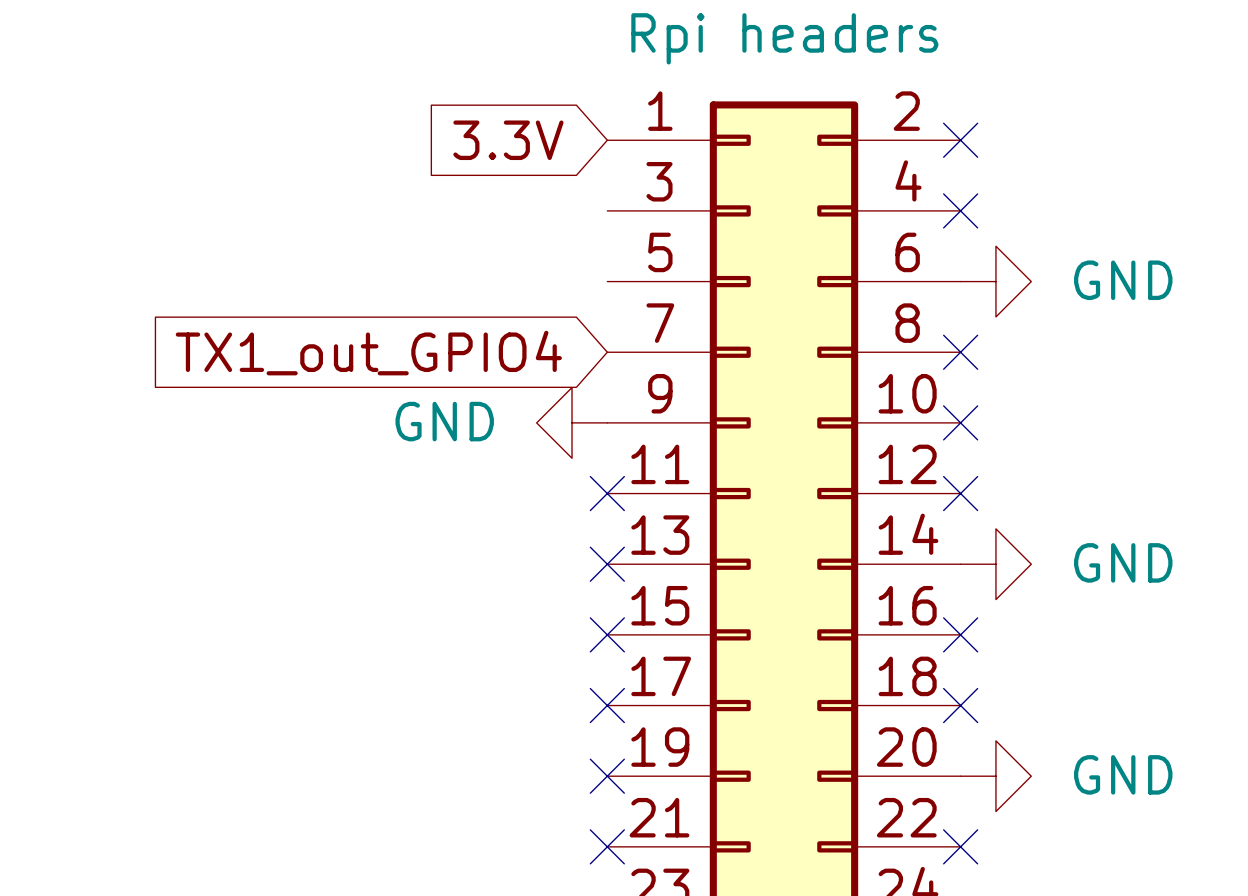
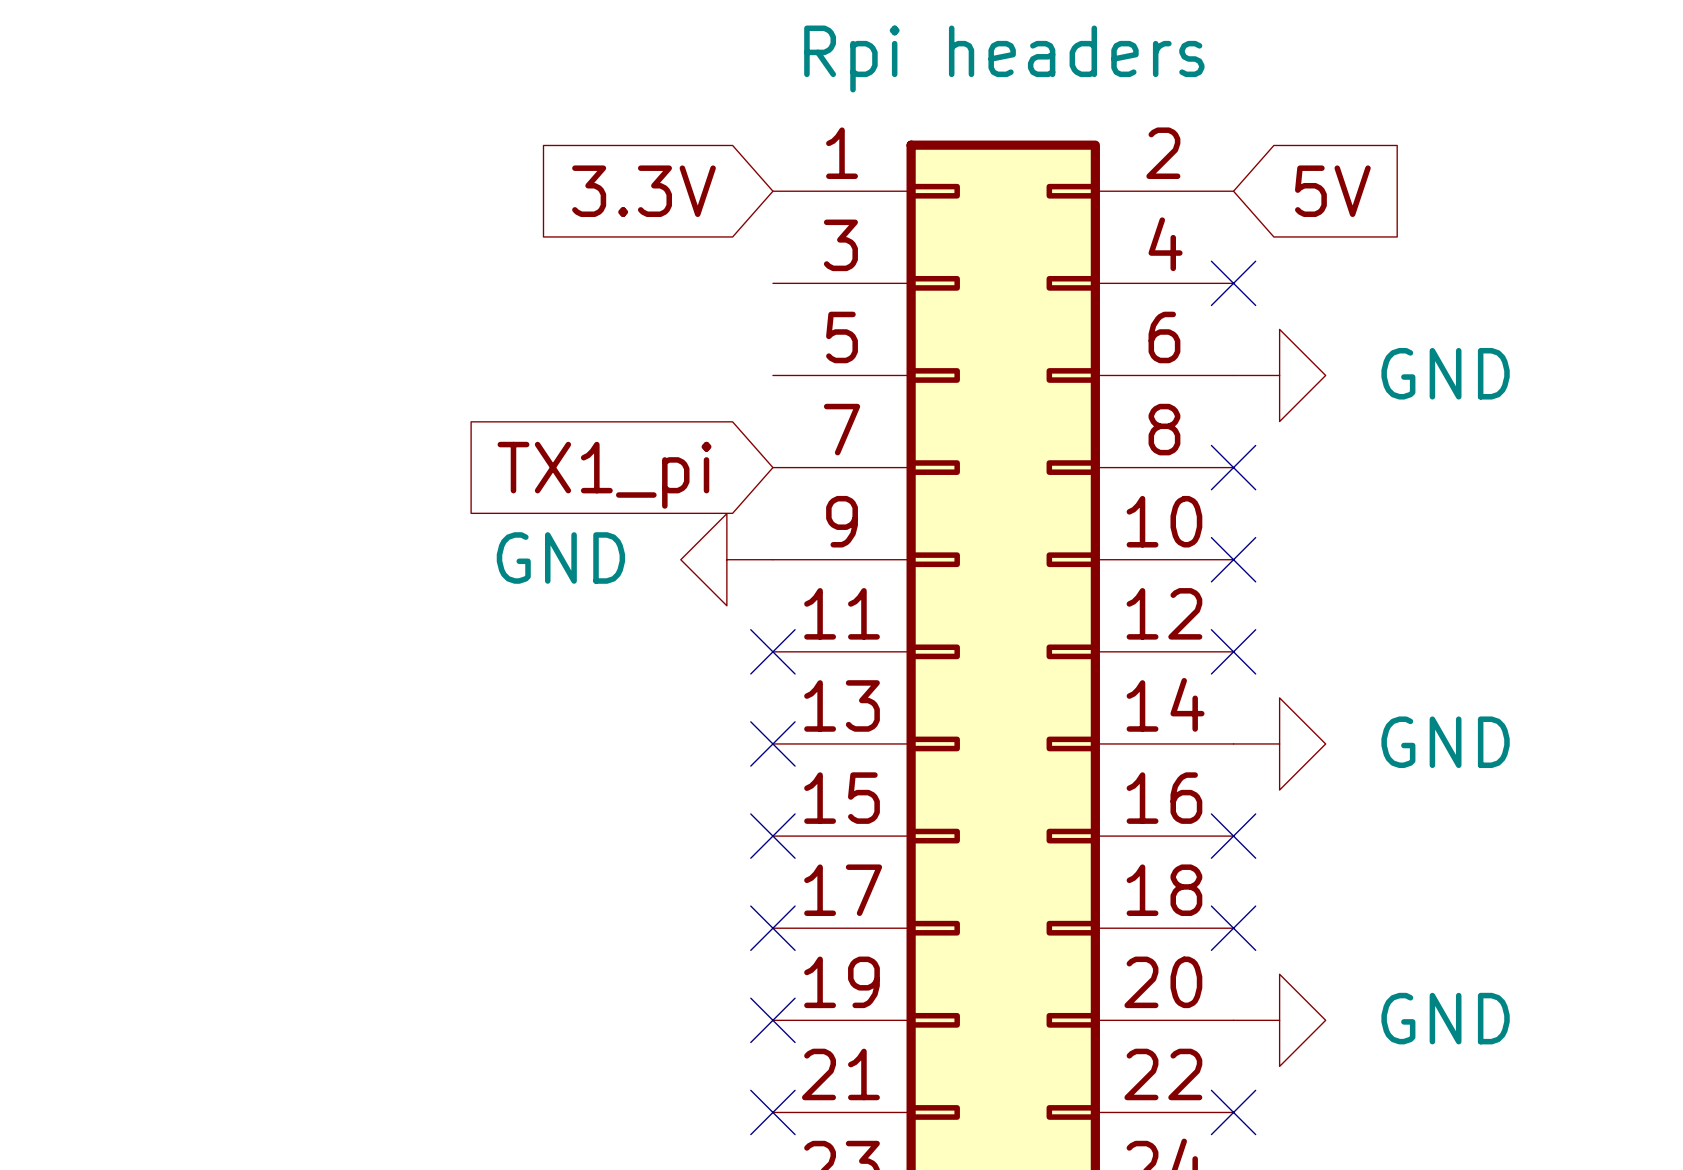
no-connect mark: (960, 140) -> none
global label: none -> 5V (1332, 191)
global label: TX1_out_GPIO4 (368, 353) -> TX1_pi (604, 475)

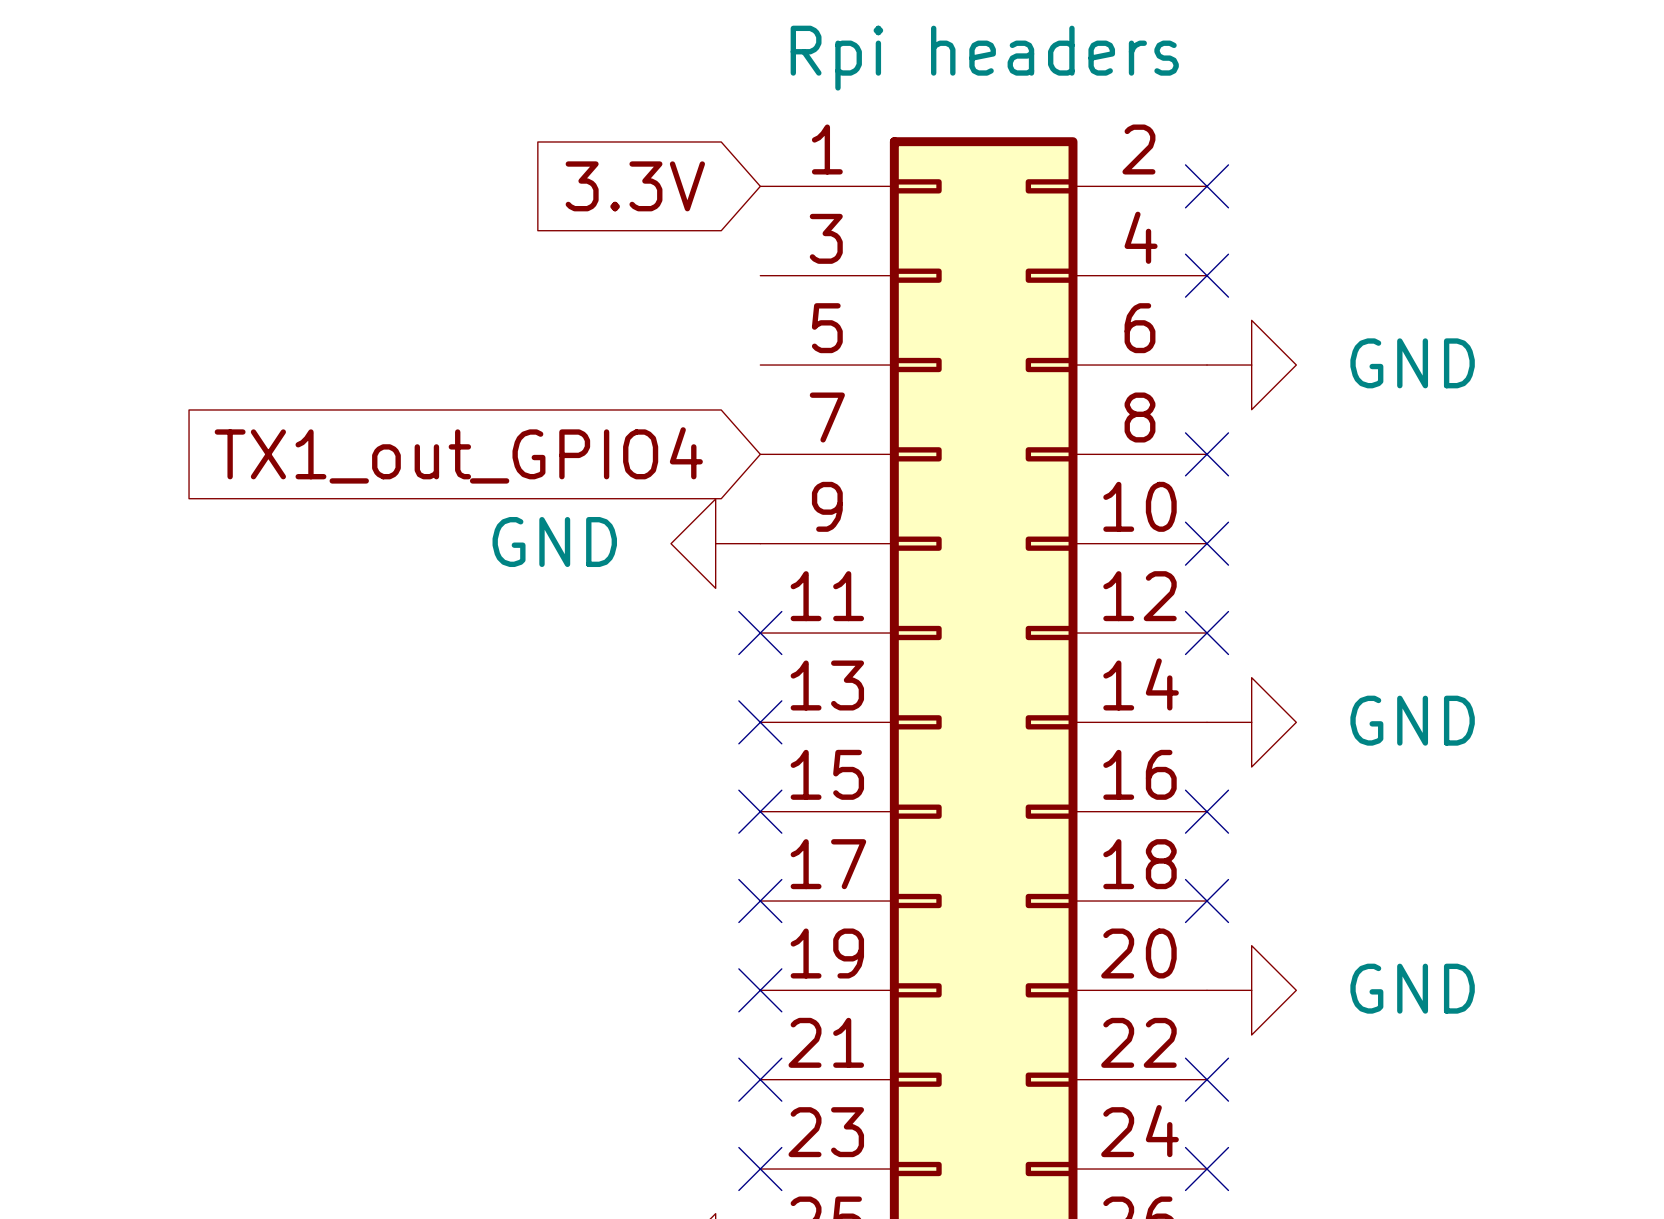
no-connect mark: none -> (1207, 186)
global label: 5V (1332, 191) -> none
global label: TX1_pi (604, 475) -> TX1_out_GPIO4 (458, 455)

